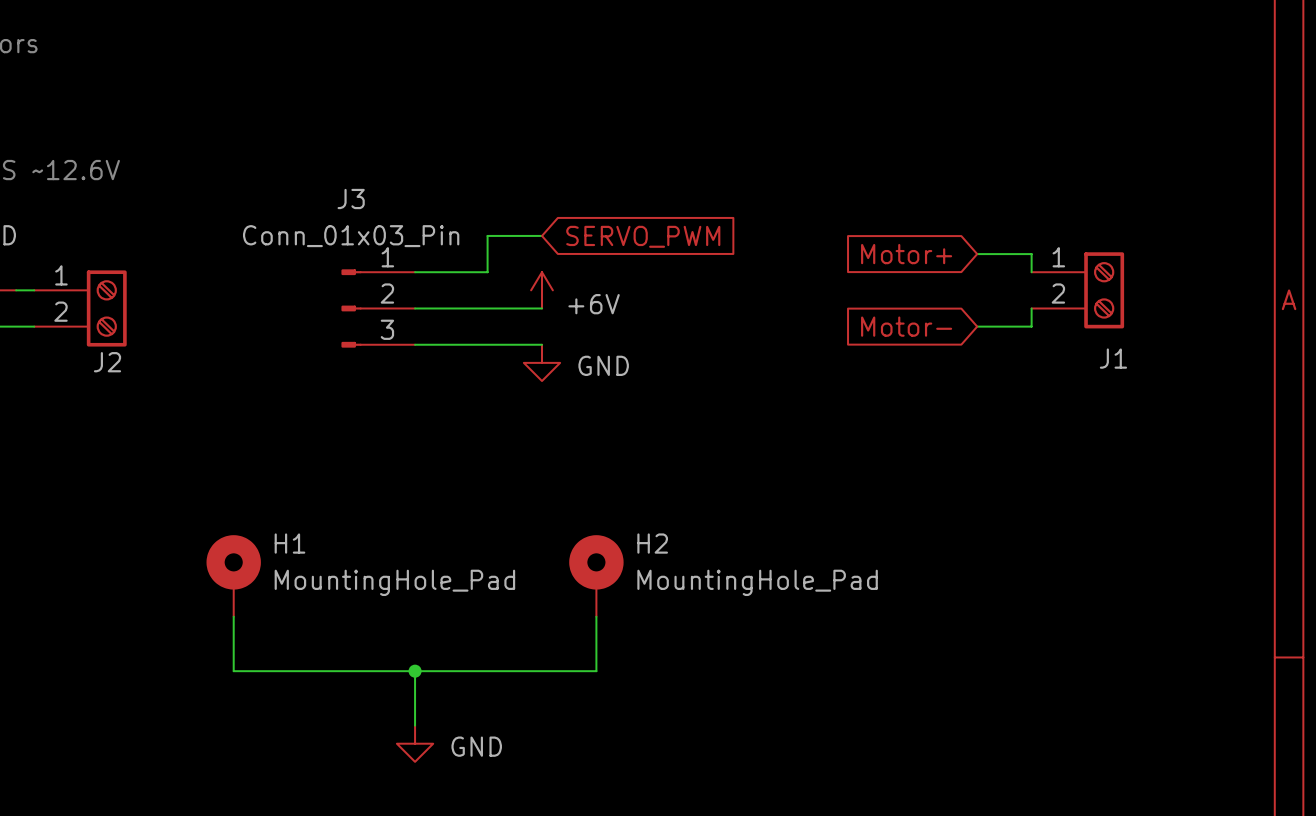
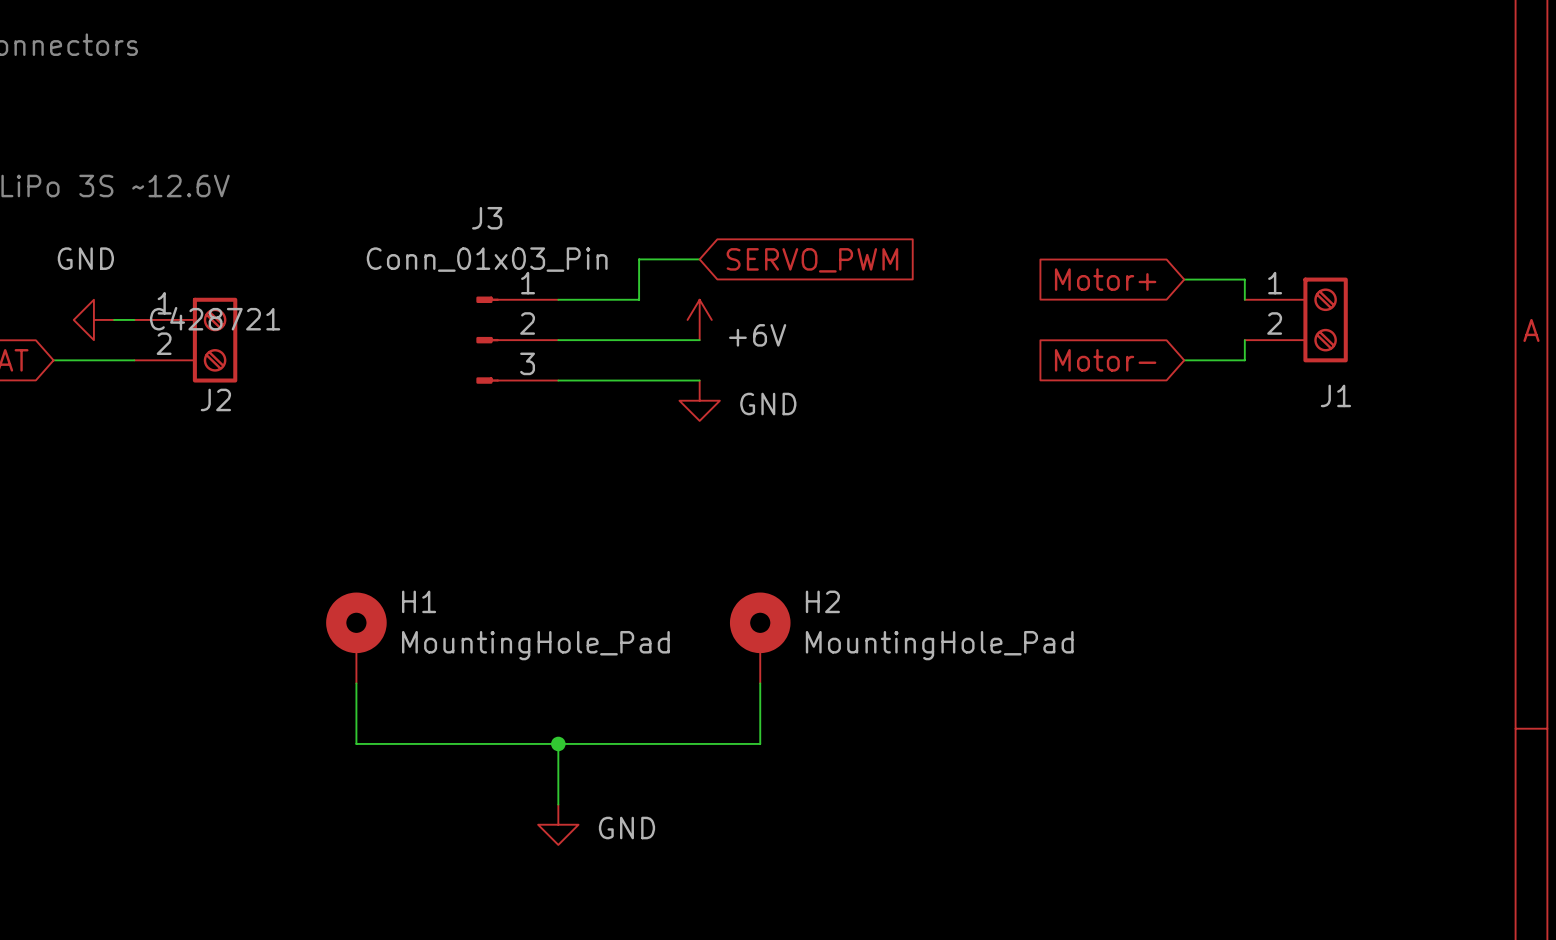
J2 text: none -> C428721 (215, 318)

